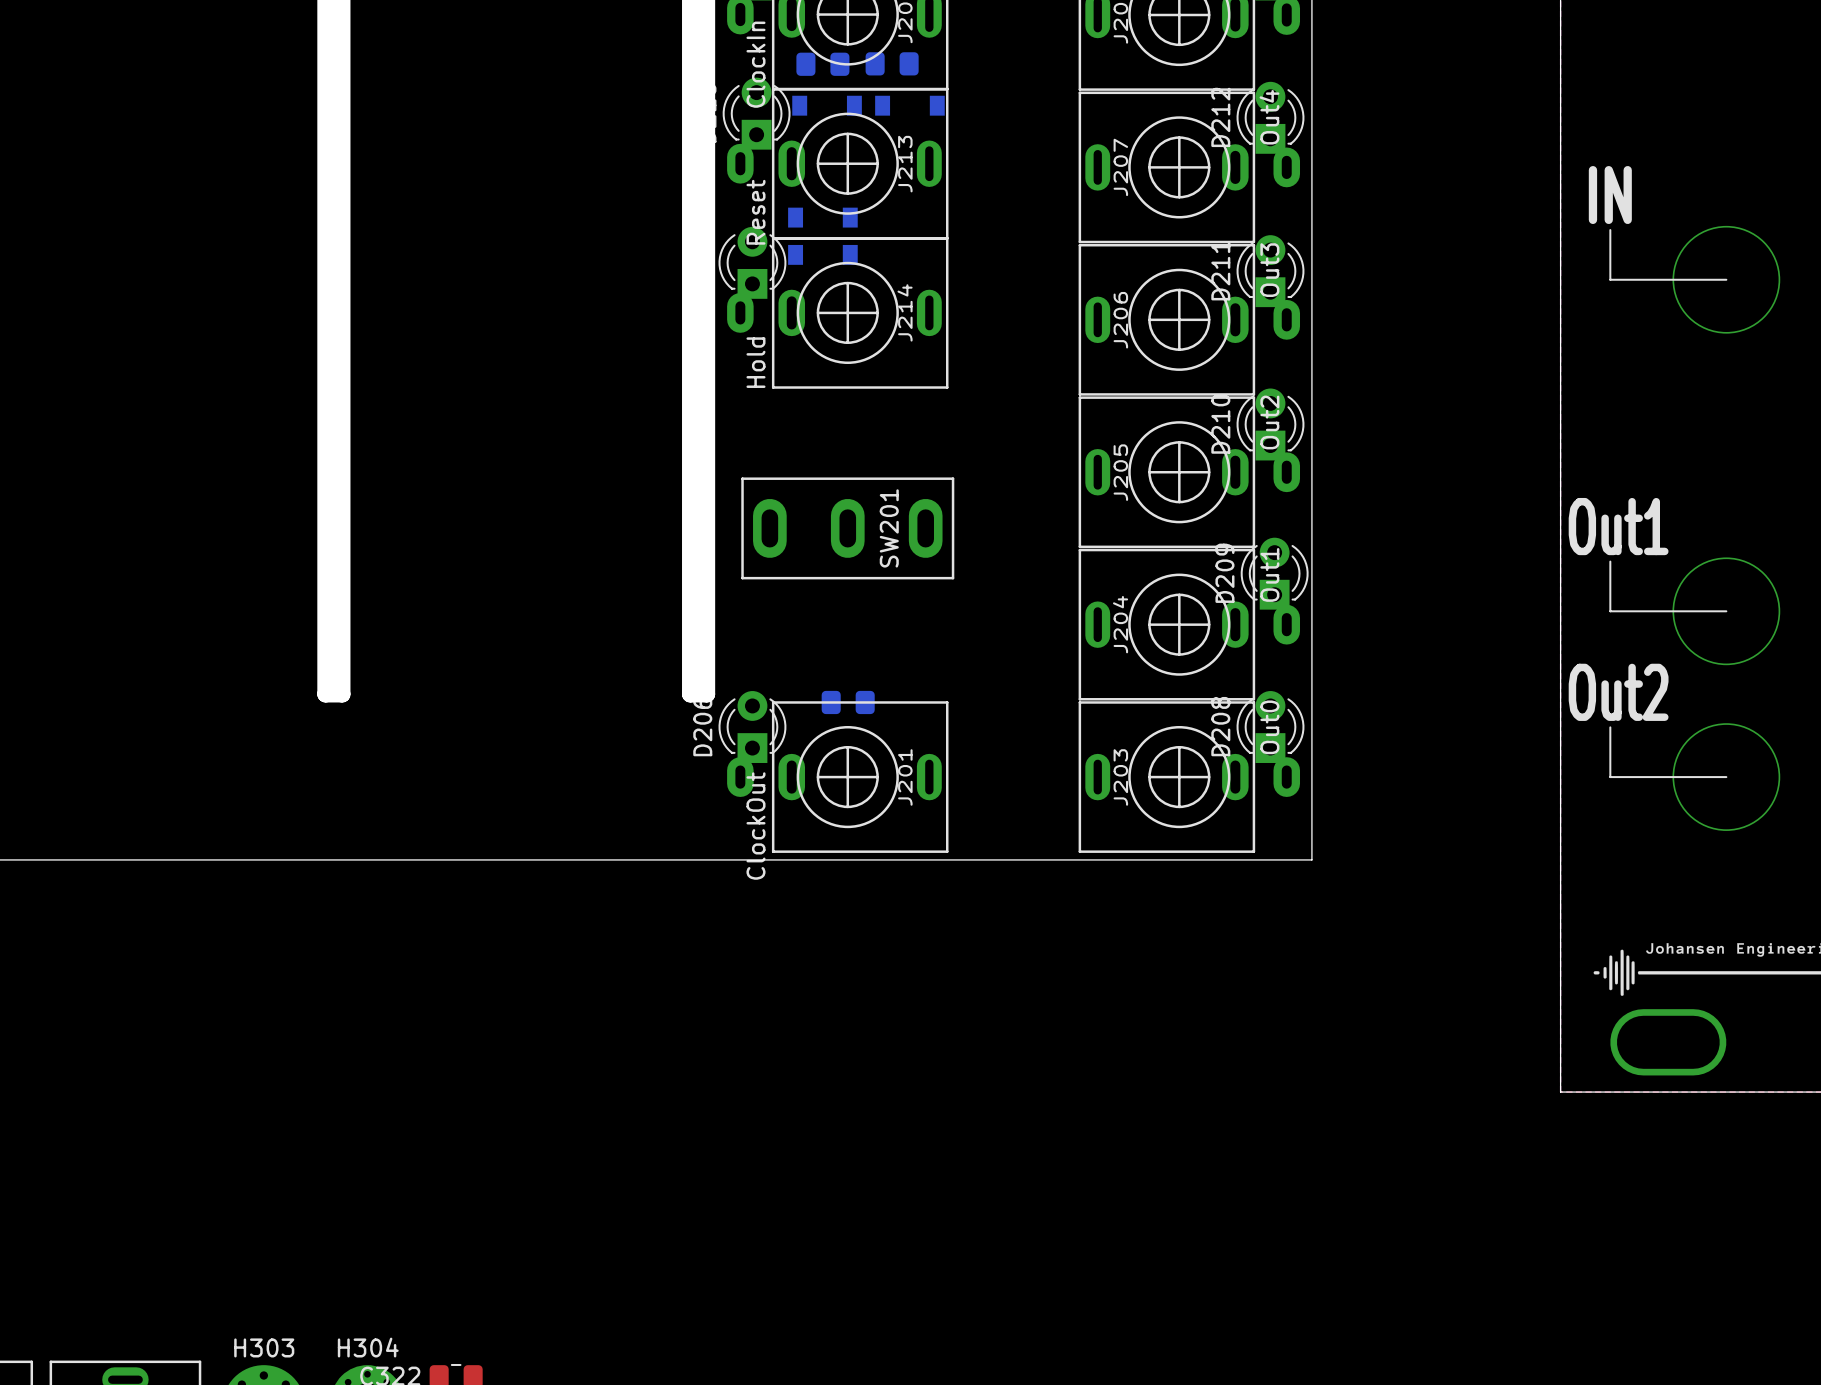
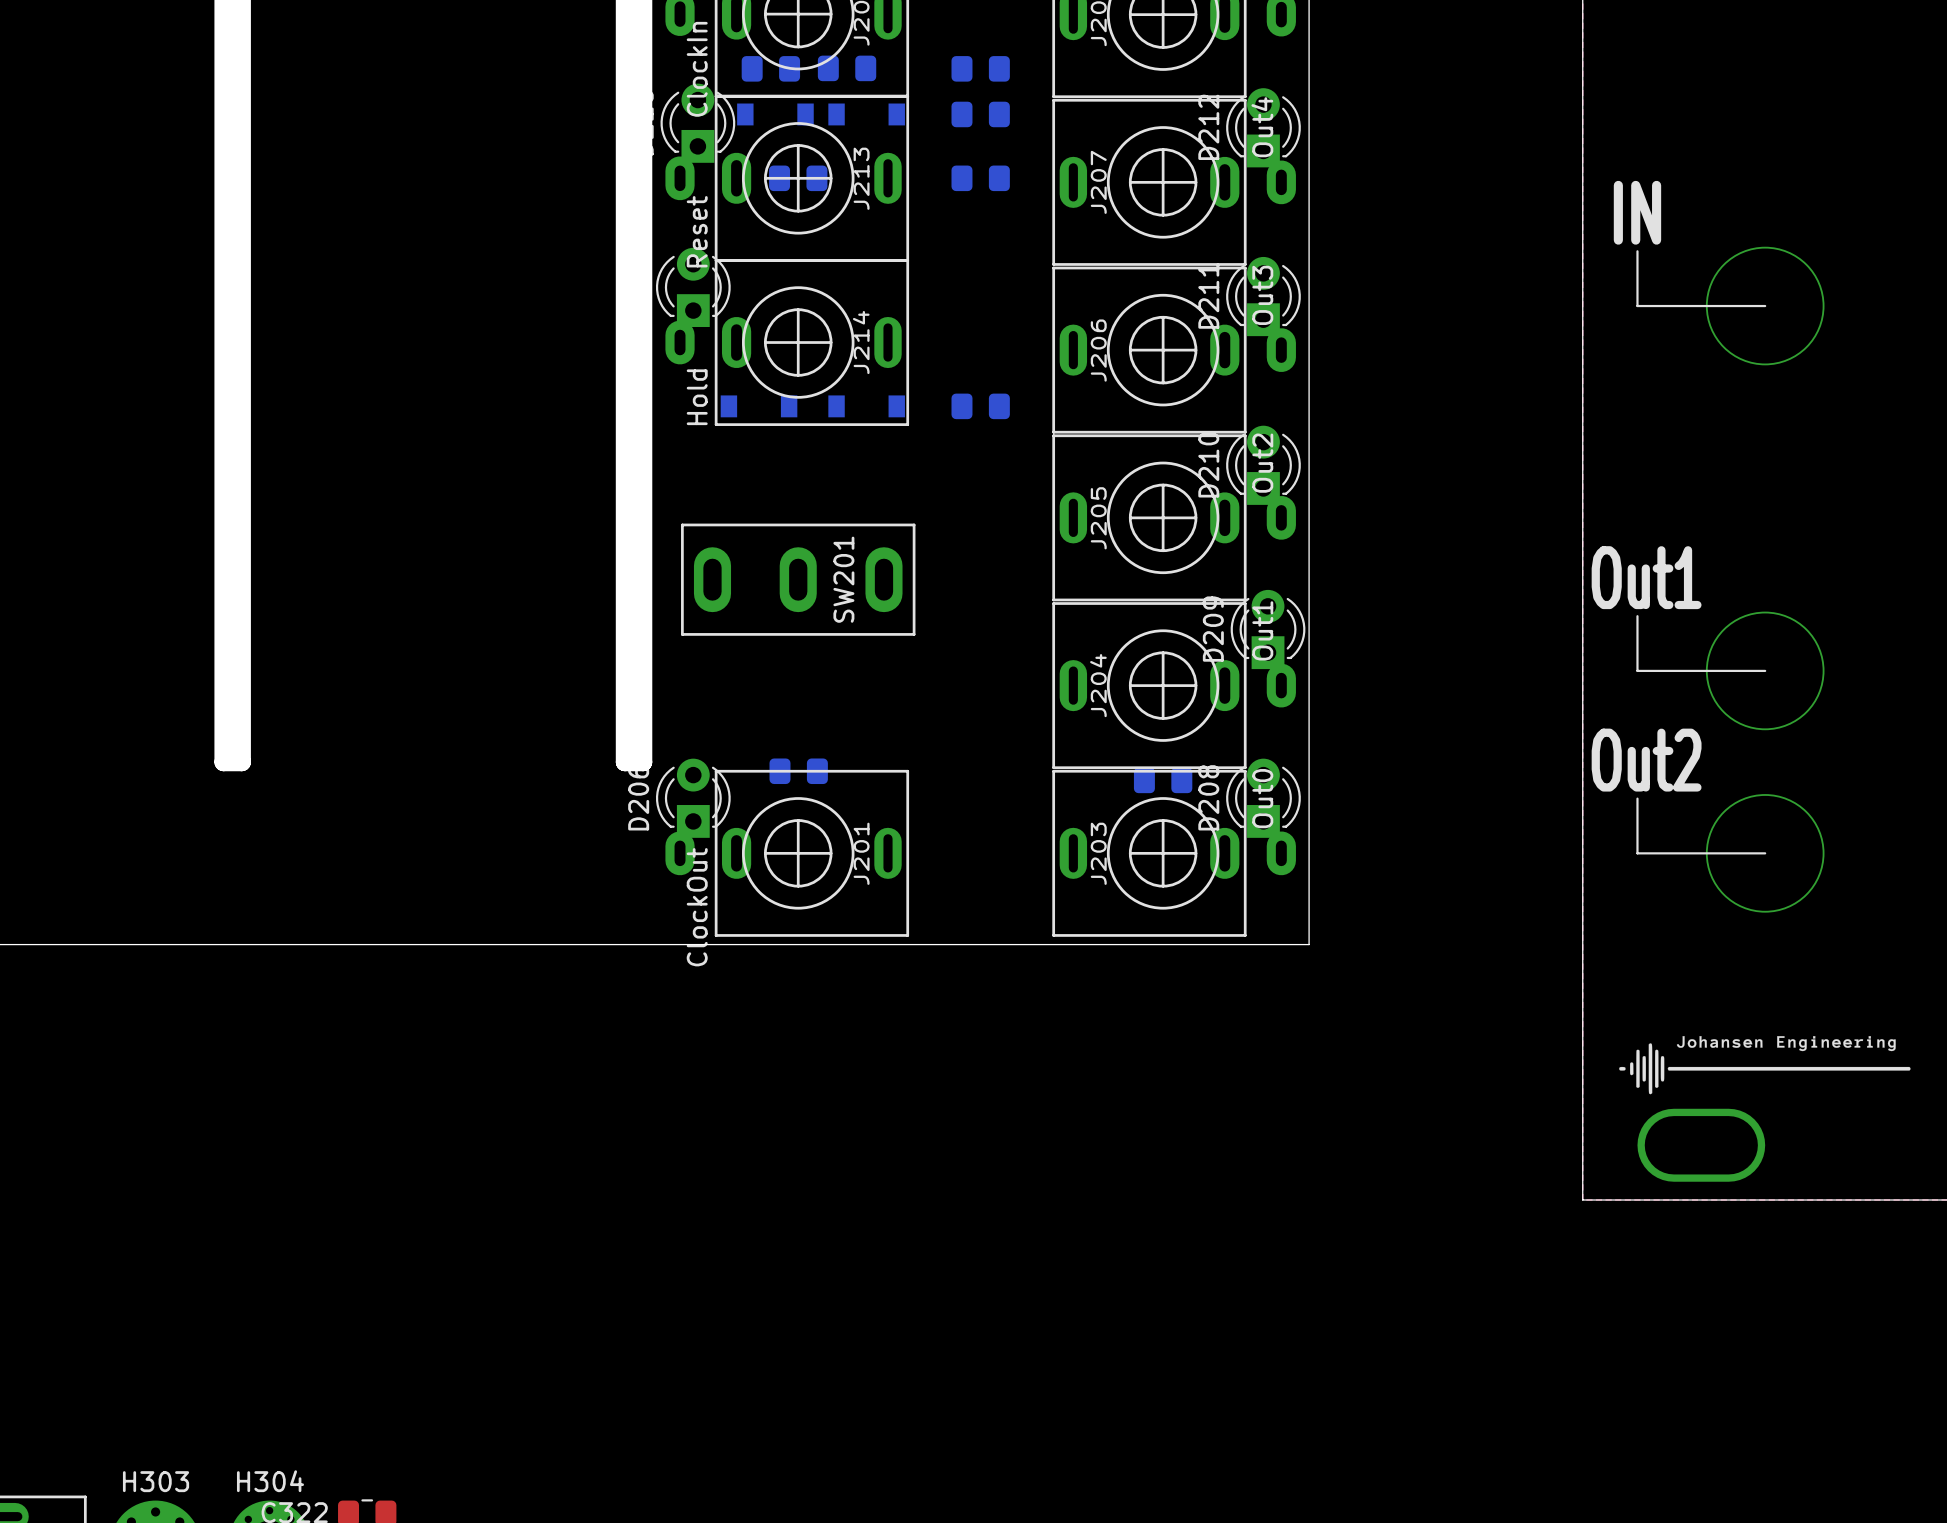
part: none -> (980, 68)
part: none -> (980, 114)
part: none -> (798, 178)
part: none -> (980, 178)
part: (822, 217) -> none
part: (822, 254) -> none
part: none -> (759, 406)
part: none -> (866, 406)
part: none -> (980, 406)
part: none -> (1163, 780)

